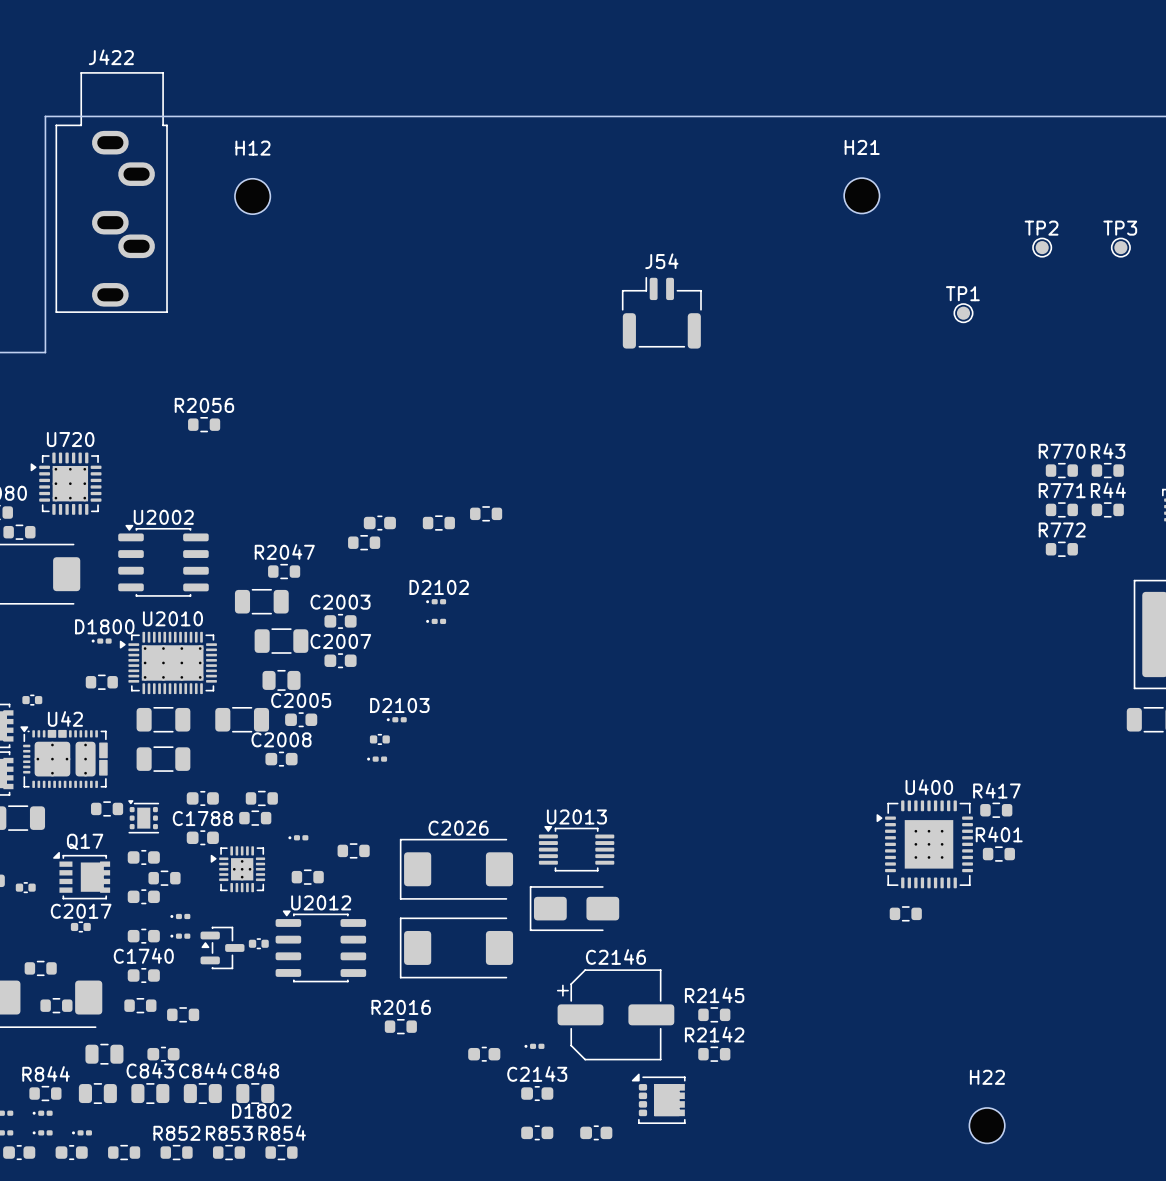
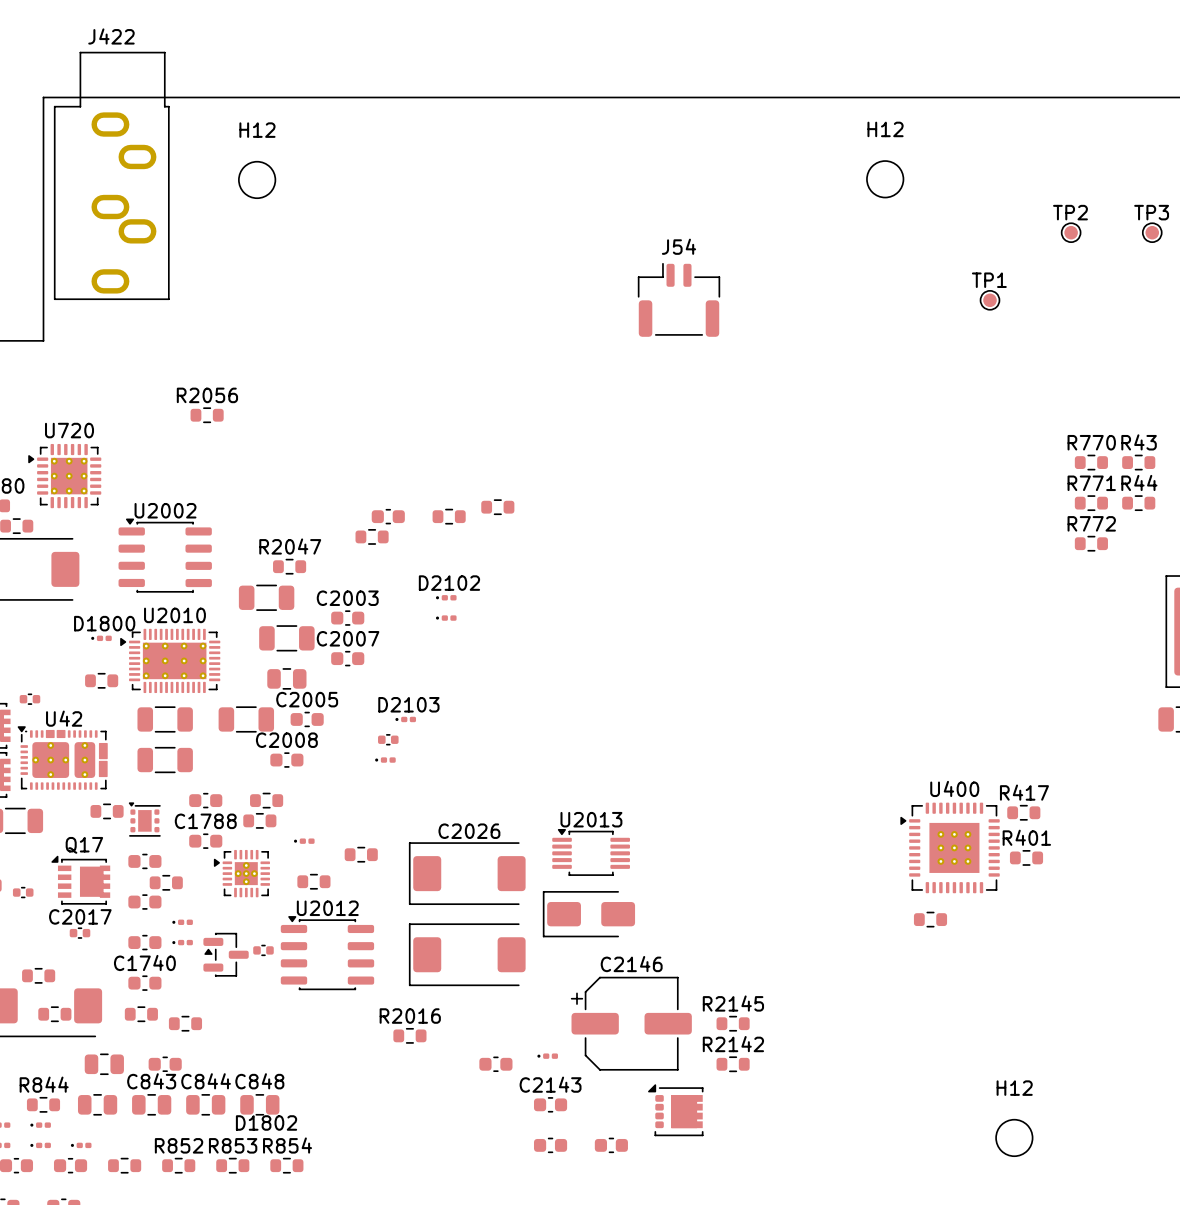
H21 name: H21 (862, 147) -> H12 (885, 129)
H22 name: H22 (987, 1077) -> H12 (1014, 1088)

